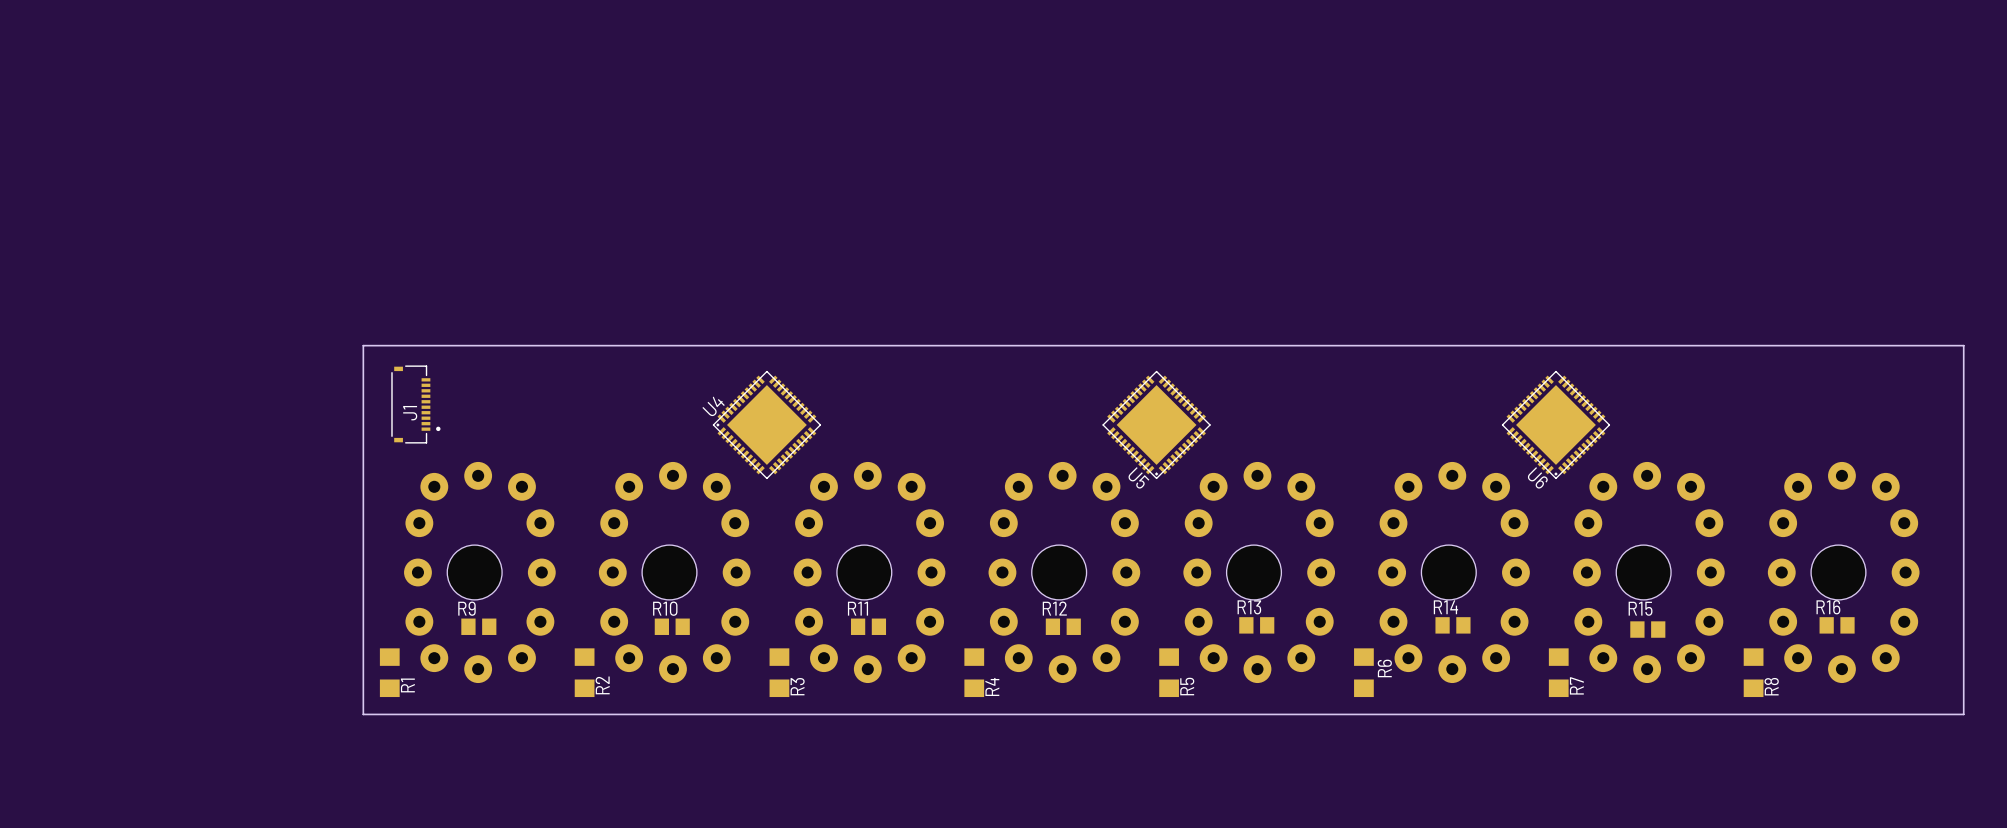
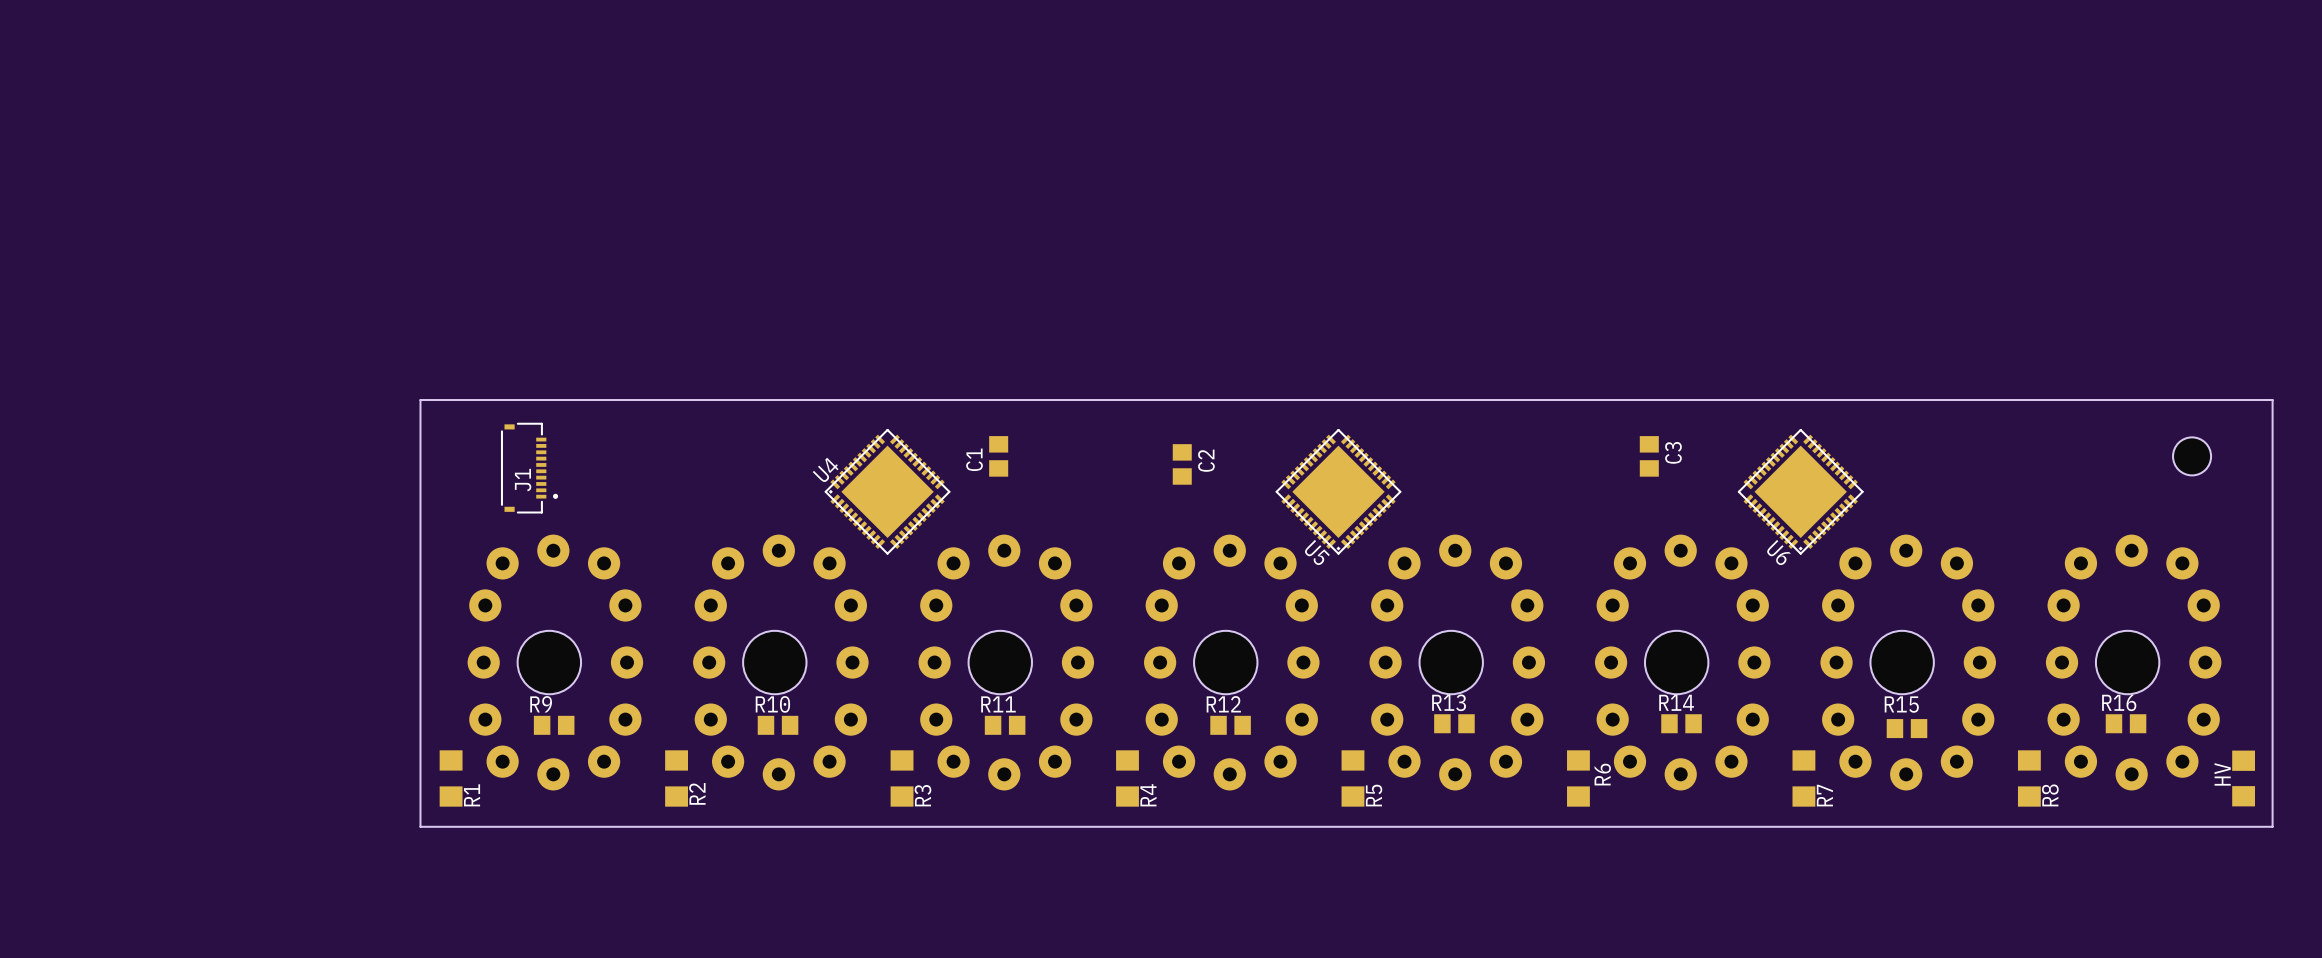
C1: none -> (998, 456)
C3: none -> (1649, 456)
hole: none -> (2192, 456)
C2: none -> (1182, 464)
J1 position: (415, 404) -> (529, 468)
HV: none -> (2243, 778)

